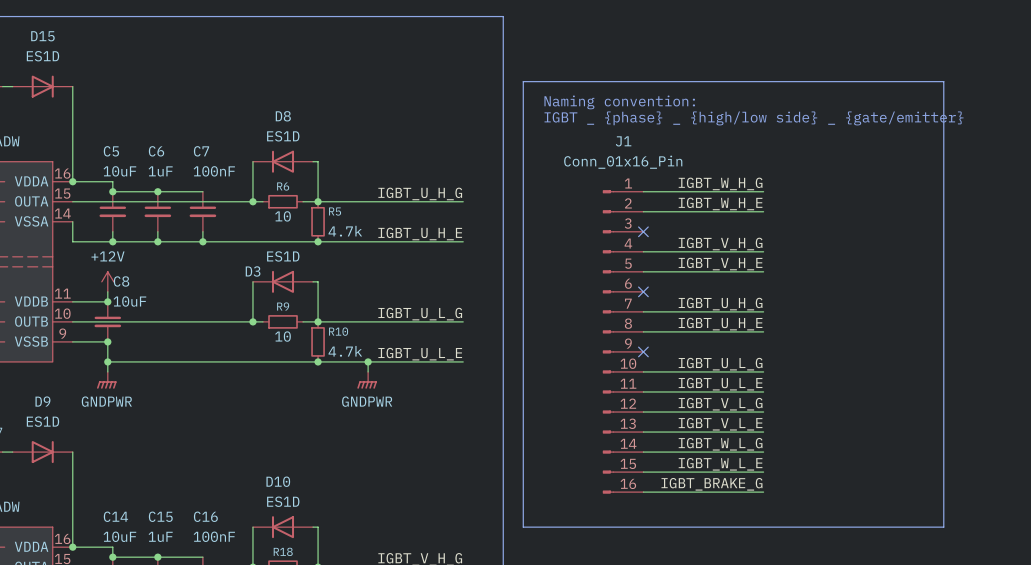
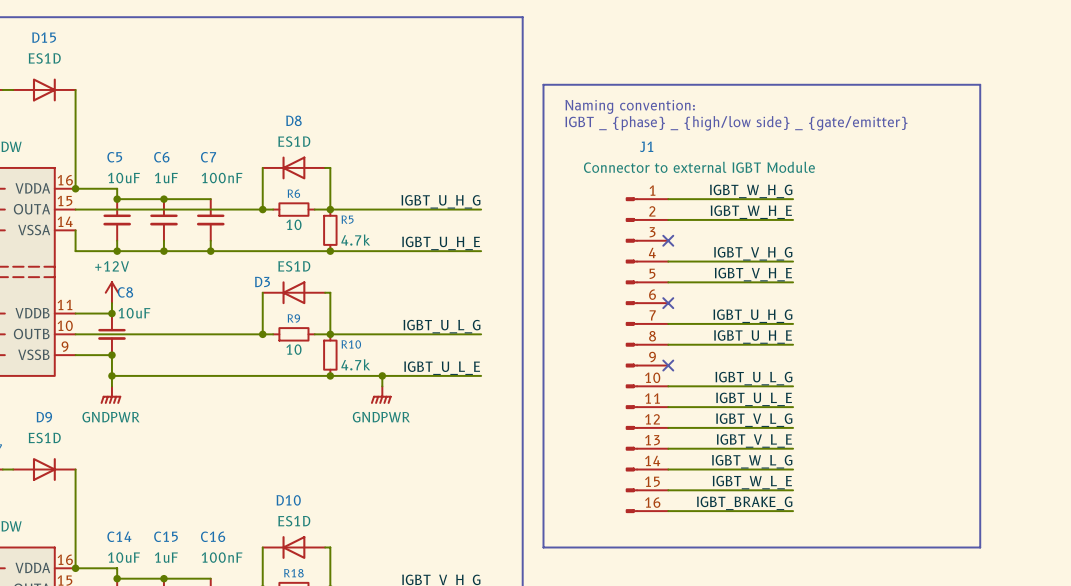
J1 value: Conn_01x16_Pin (623, 162) -> Connector to external IGBT Module (699, 167)

